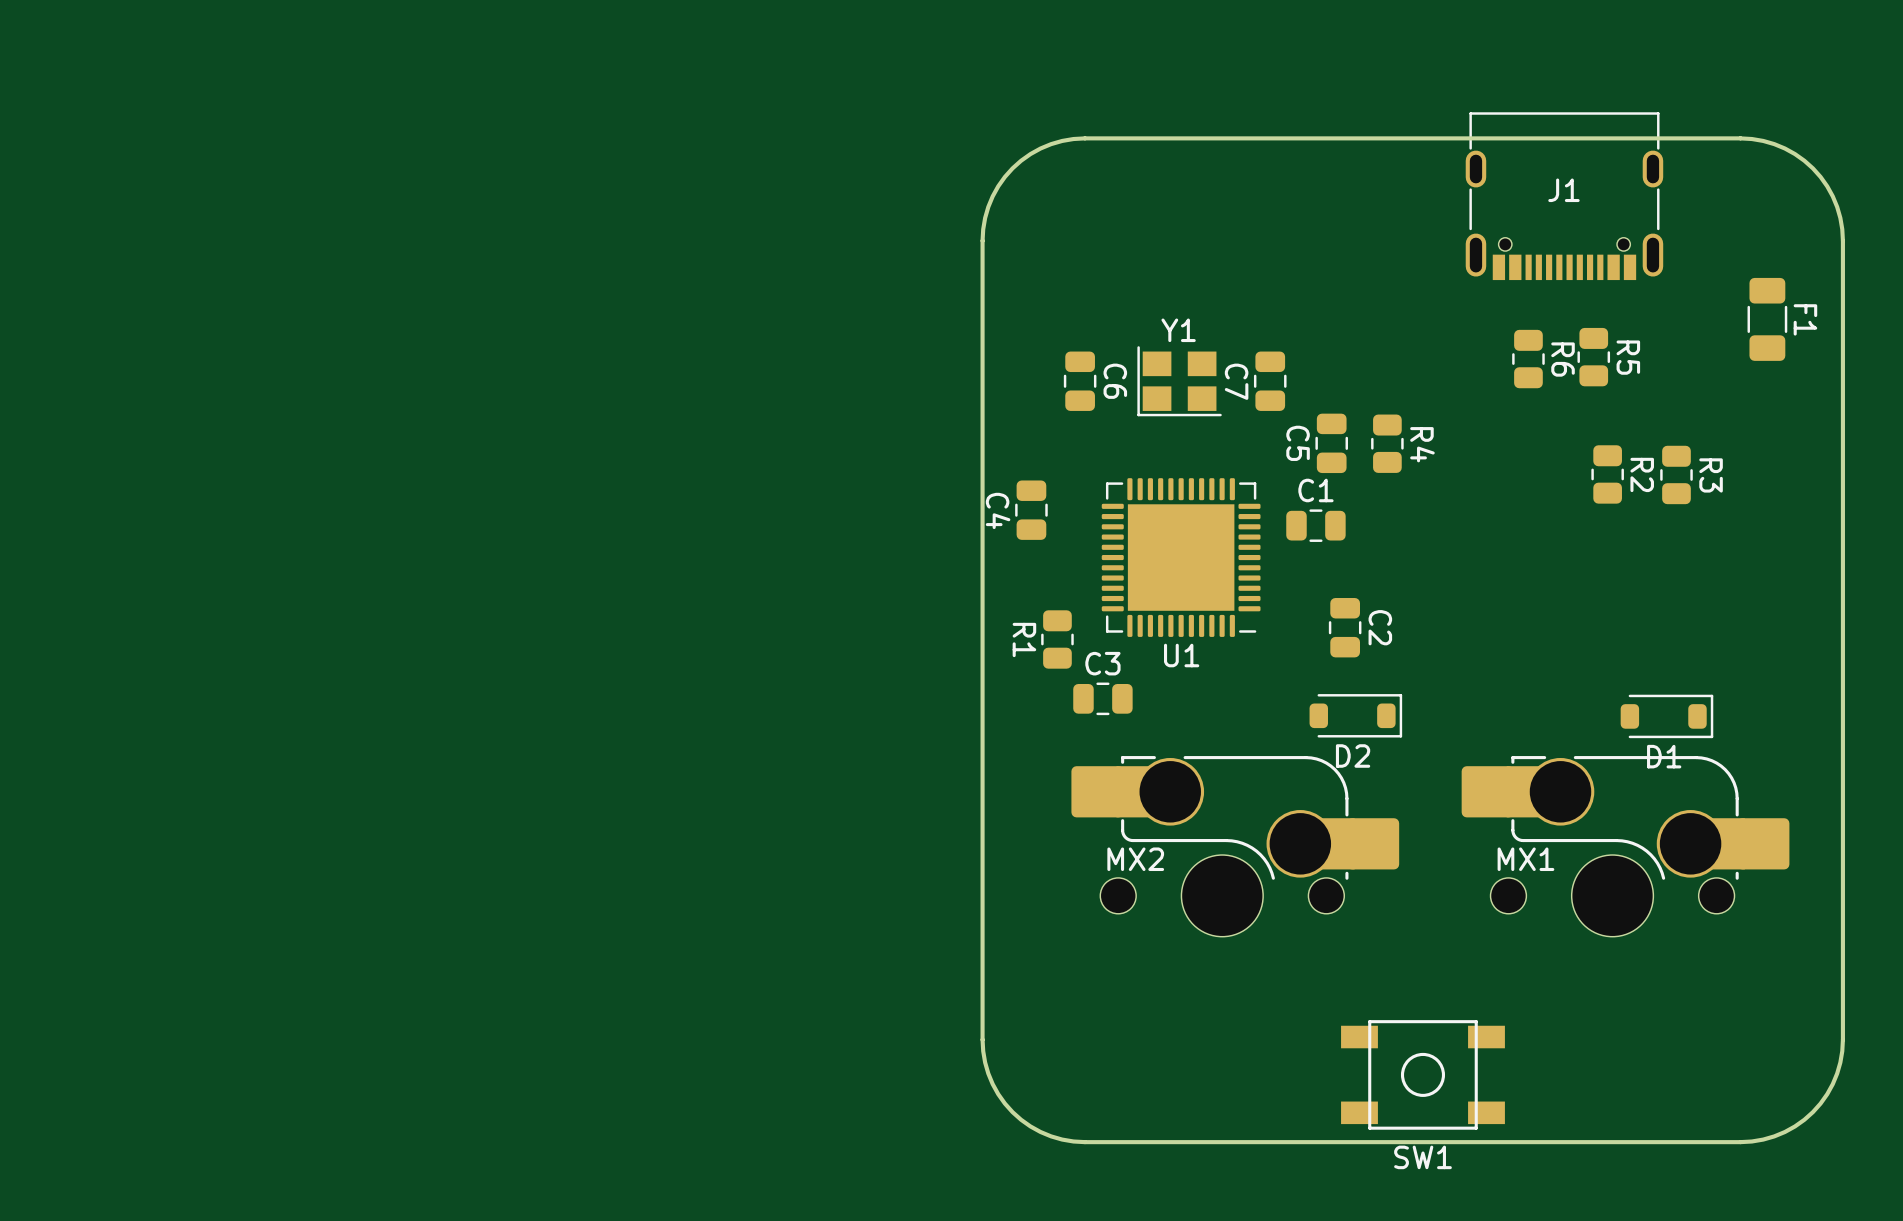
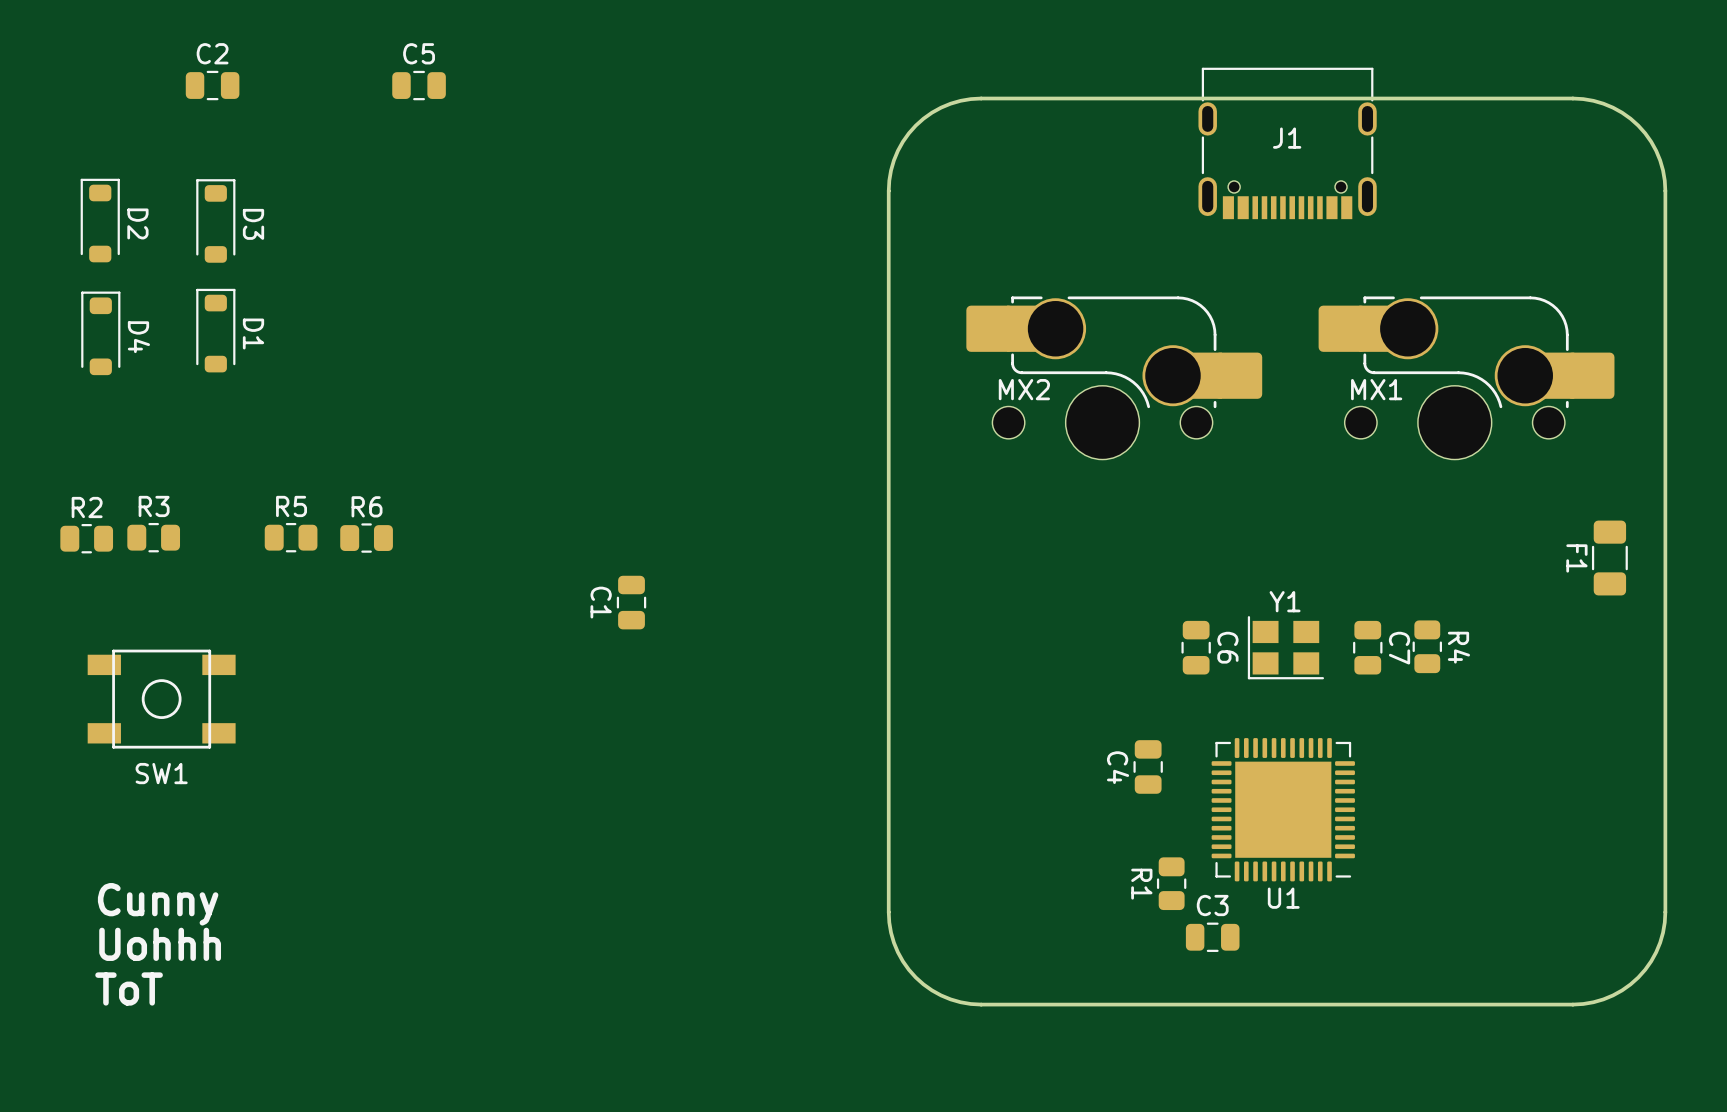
J1 position: (1564, 196) -> (1287, 143)
D3: none -> (215, 220)
F1 position: (1767, 319) -> (1609, 558)
F1 name position: F1 (1805, 319) -> F1 (1576, 558)
R5 rotation: 0° (1593, 357) -> 90° clockwise (291, 537)
R5 position: (1593, 357) -> (291, 537)
R5 name position: R5 (1628, 357) -> R5 (291, 506)
R6 rotation: 0° (1528, 359) -> 90° clockwise (366, 538)
R6 position: (1528, 359) -> (366, 538)
R6 name position: R6 (1563, 359) -> R6 (367, 506)
C6 position: (1080, 381) -> (1196, 647)
Y1 position: (1179, 381) -> (1285, 647)
C7 name position: C7 (1236, 381) -> C7 (1399, 648)
C7 position: (1270, 381) -> (1367, 647)
D4: none -> (100, 333)
C5 rotation: 0° (1331, 443) -> 90° clockwise (419, 85)
C5 position: (1331, 443) -> (419, 85)
R4 position: (1387, 443) -> (1427, 646)
R2 rotation: 0° (1607, 474) -> 90° clockwise (86, 538)
R2 position: (1607, 474) -> (86, 538)
R2 name position: R2 (1642, 474) -> R2 (87, 507)
R3 rotation: 0° (1676, 474) -> 90° clockwise (153, 537)
R3 position: (1676, 474) -> (153, 537)
R3 name position: R3 (1711, 475) -> R3 (154, 506)
C1 name position: C1 (1315, 490) -> C1 (601, 602)
C4 position: (1031, 510) -> (1148, 766)
C1 rotation: 0° (1315, 525) -> 90° clockwise (631, 602)
C1 position: (1315, 525) -> (631, 602)
U1 position: (1181, 557) -> (1283, 809)
C2 rotation: 0° (1345, 627) -> 90° clockwise (212, 85)
C2 position: (1345, 627) -> (212, 85)
C2 name position: C2 (1380, 627) -> C2 (212, 53)
R1 position: (1057, 639) -> (1171, 883)
C3 position: (1102, 698) -> (1212, 937)
D2 rotation: 0° (1355, 715) -> 90° counterclockwise (100, 220)
D2 position: (1355, 715) -> (100, 220)
D1 rotation: 0° (1666, 716) -> 90° counterclockwise (215, 330)
D1 position: (1666, 716) -> (215, 330)
MX2 position: (1235, 846) -> (1114, 378)
MX1 position: (1625, 846) -> (1466, 378)
text: none -> Cunny (158, 904)
SW1 position: (1422, 1074) -> (161, 699)
text: none -> Uohhh (160, 944)
text: none -> ToT (129, 988)

